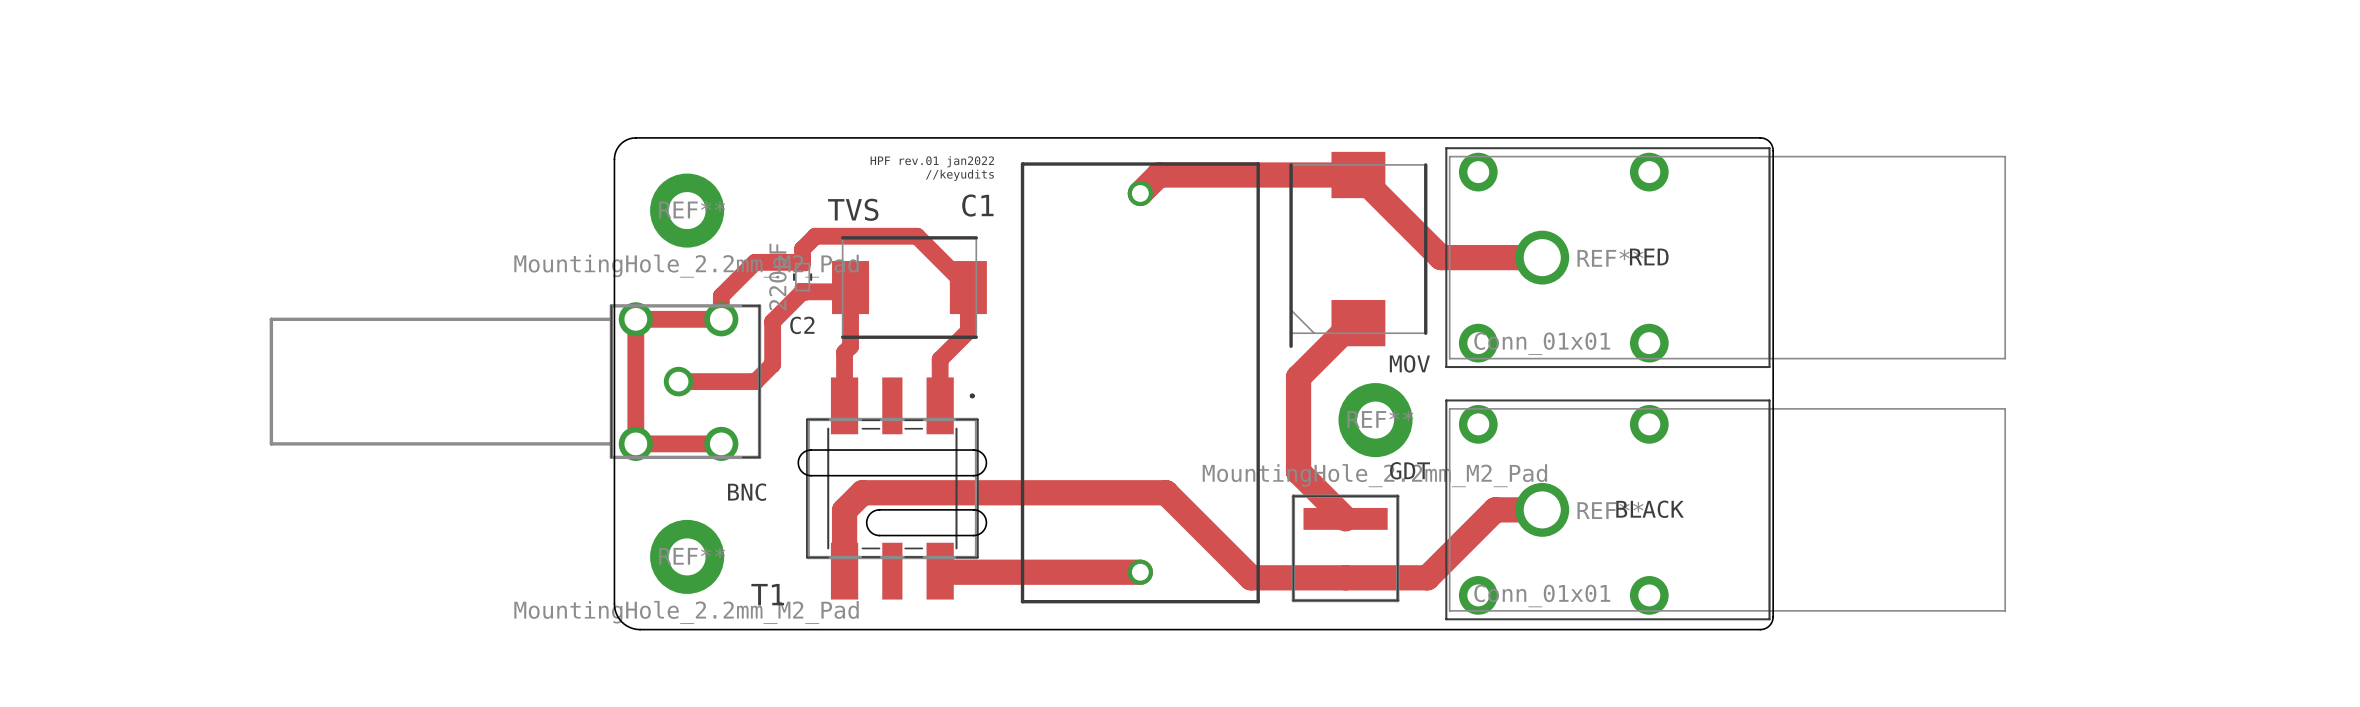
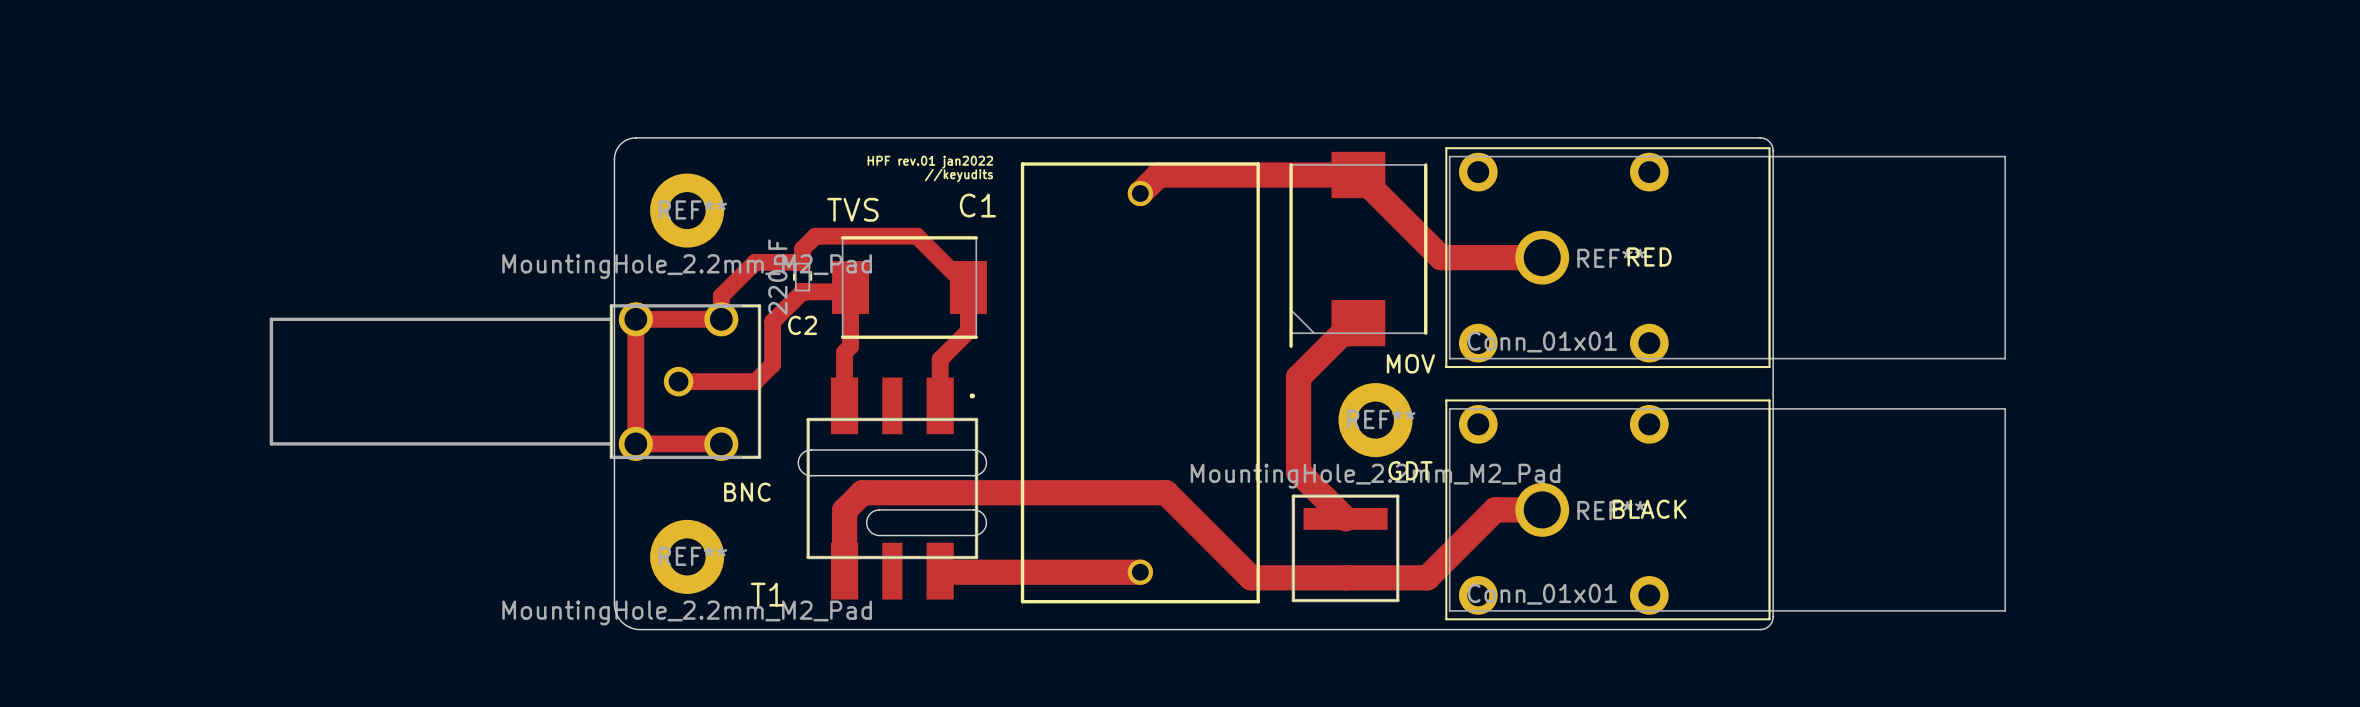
T1 footprint: [806, 377, 979, 600] -> [806, 377, 979, 600]

